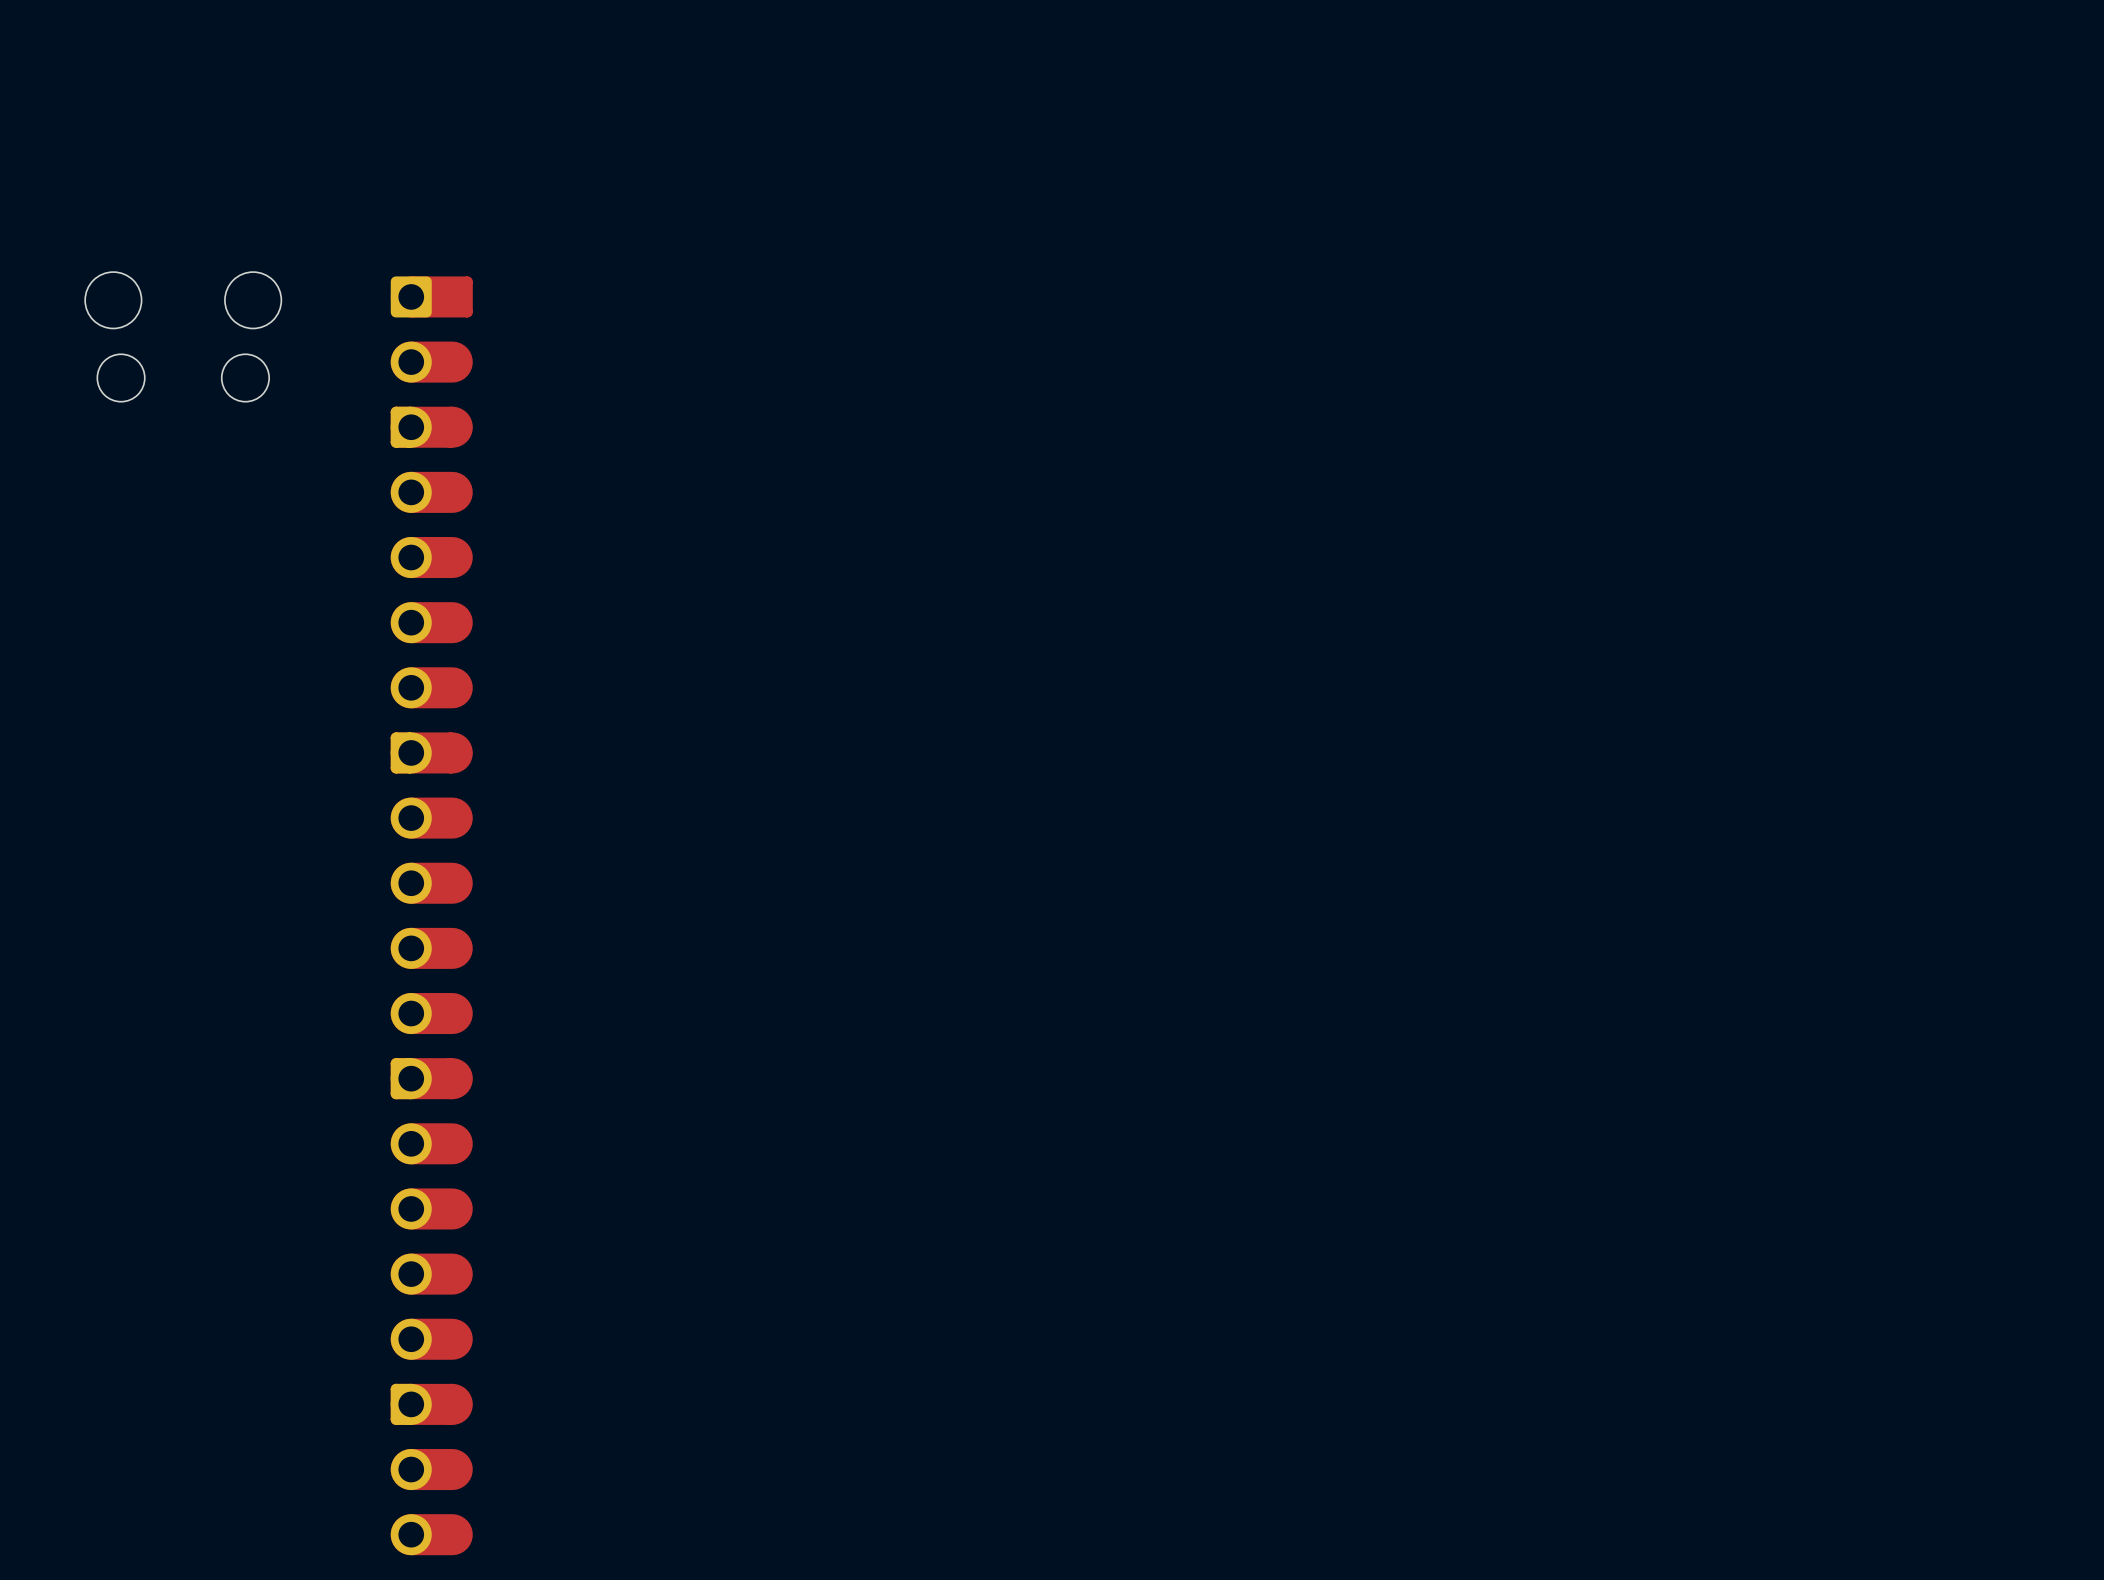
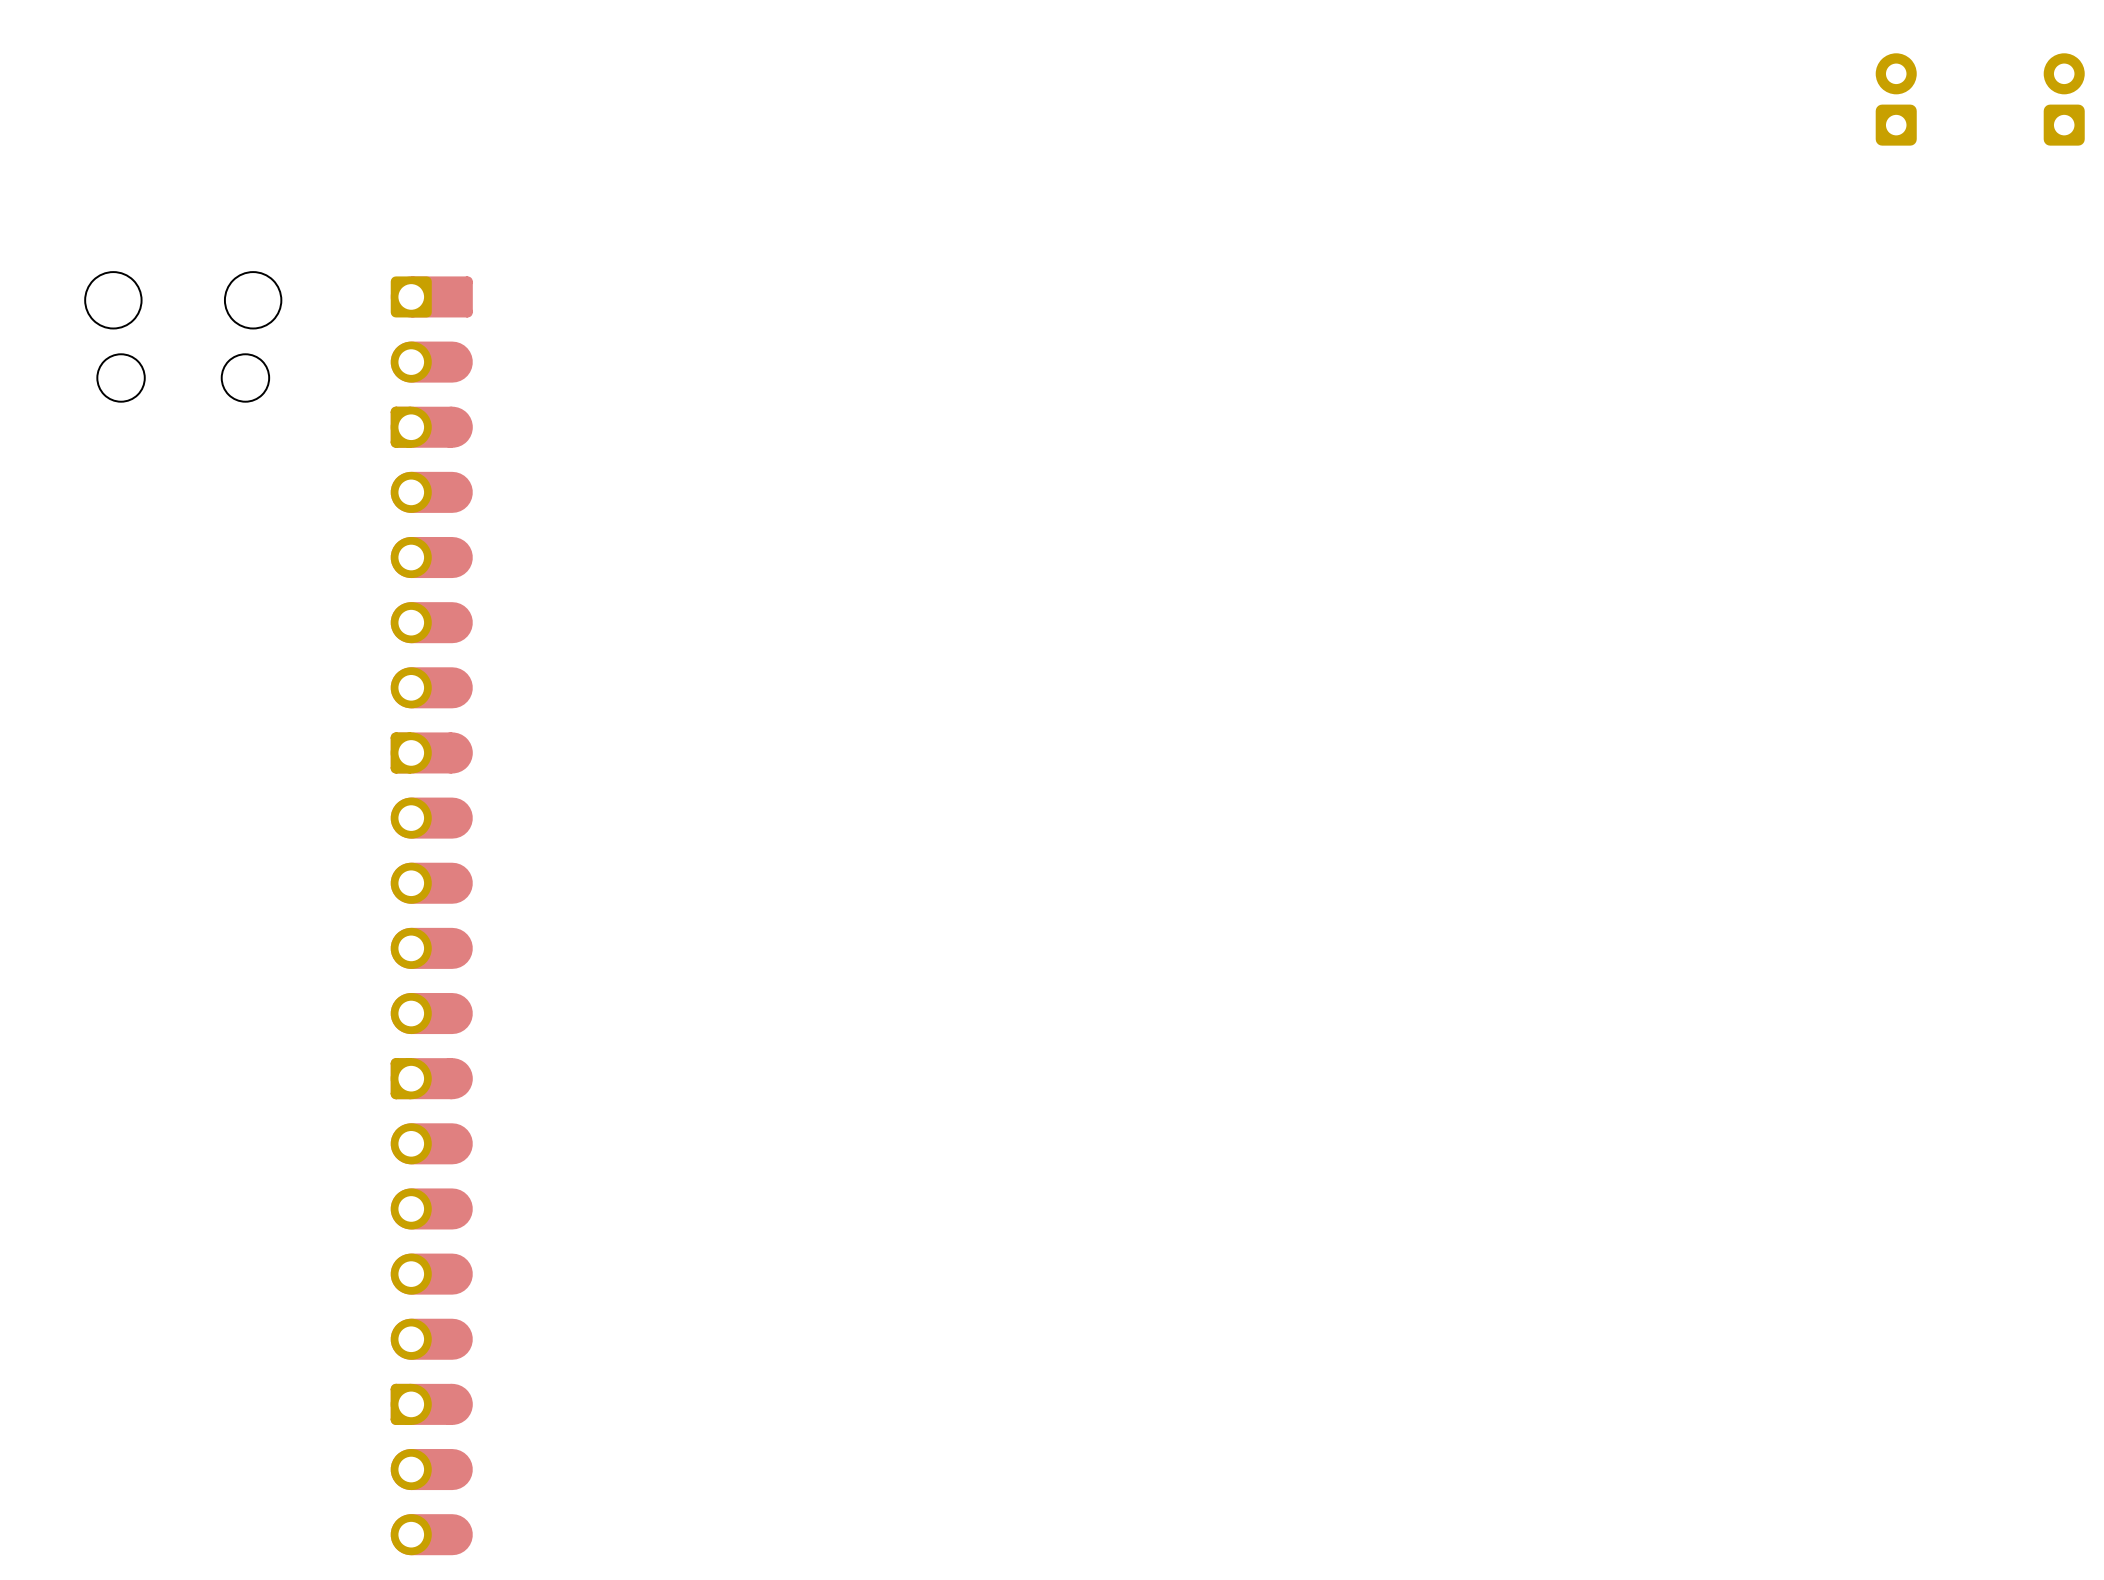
part: none -> (1896, 99)
part: none -> (2064, 99)

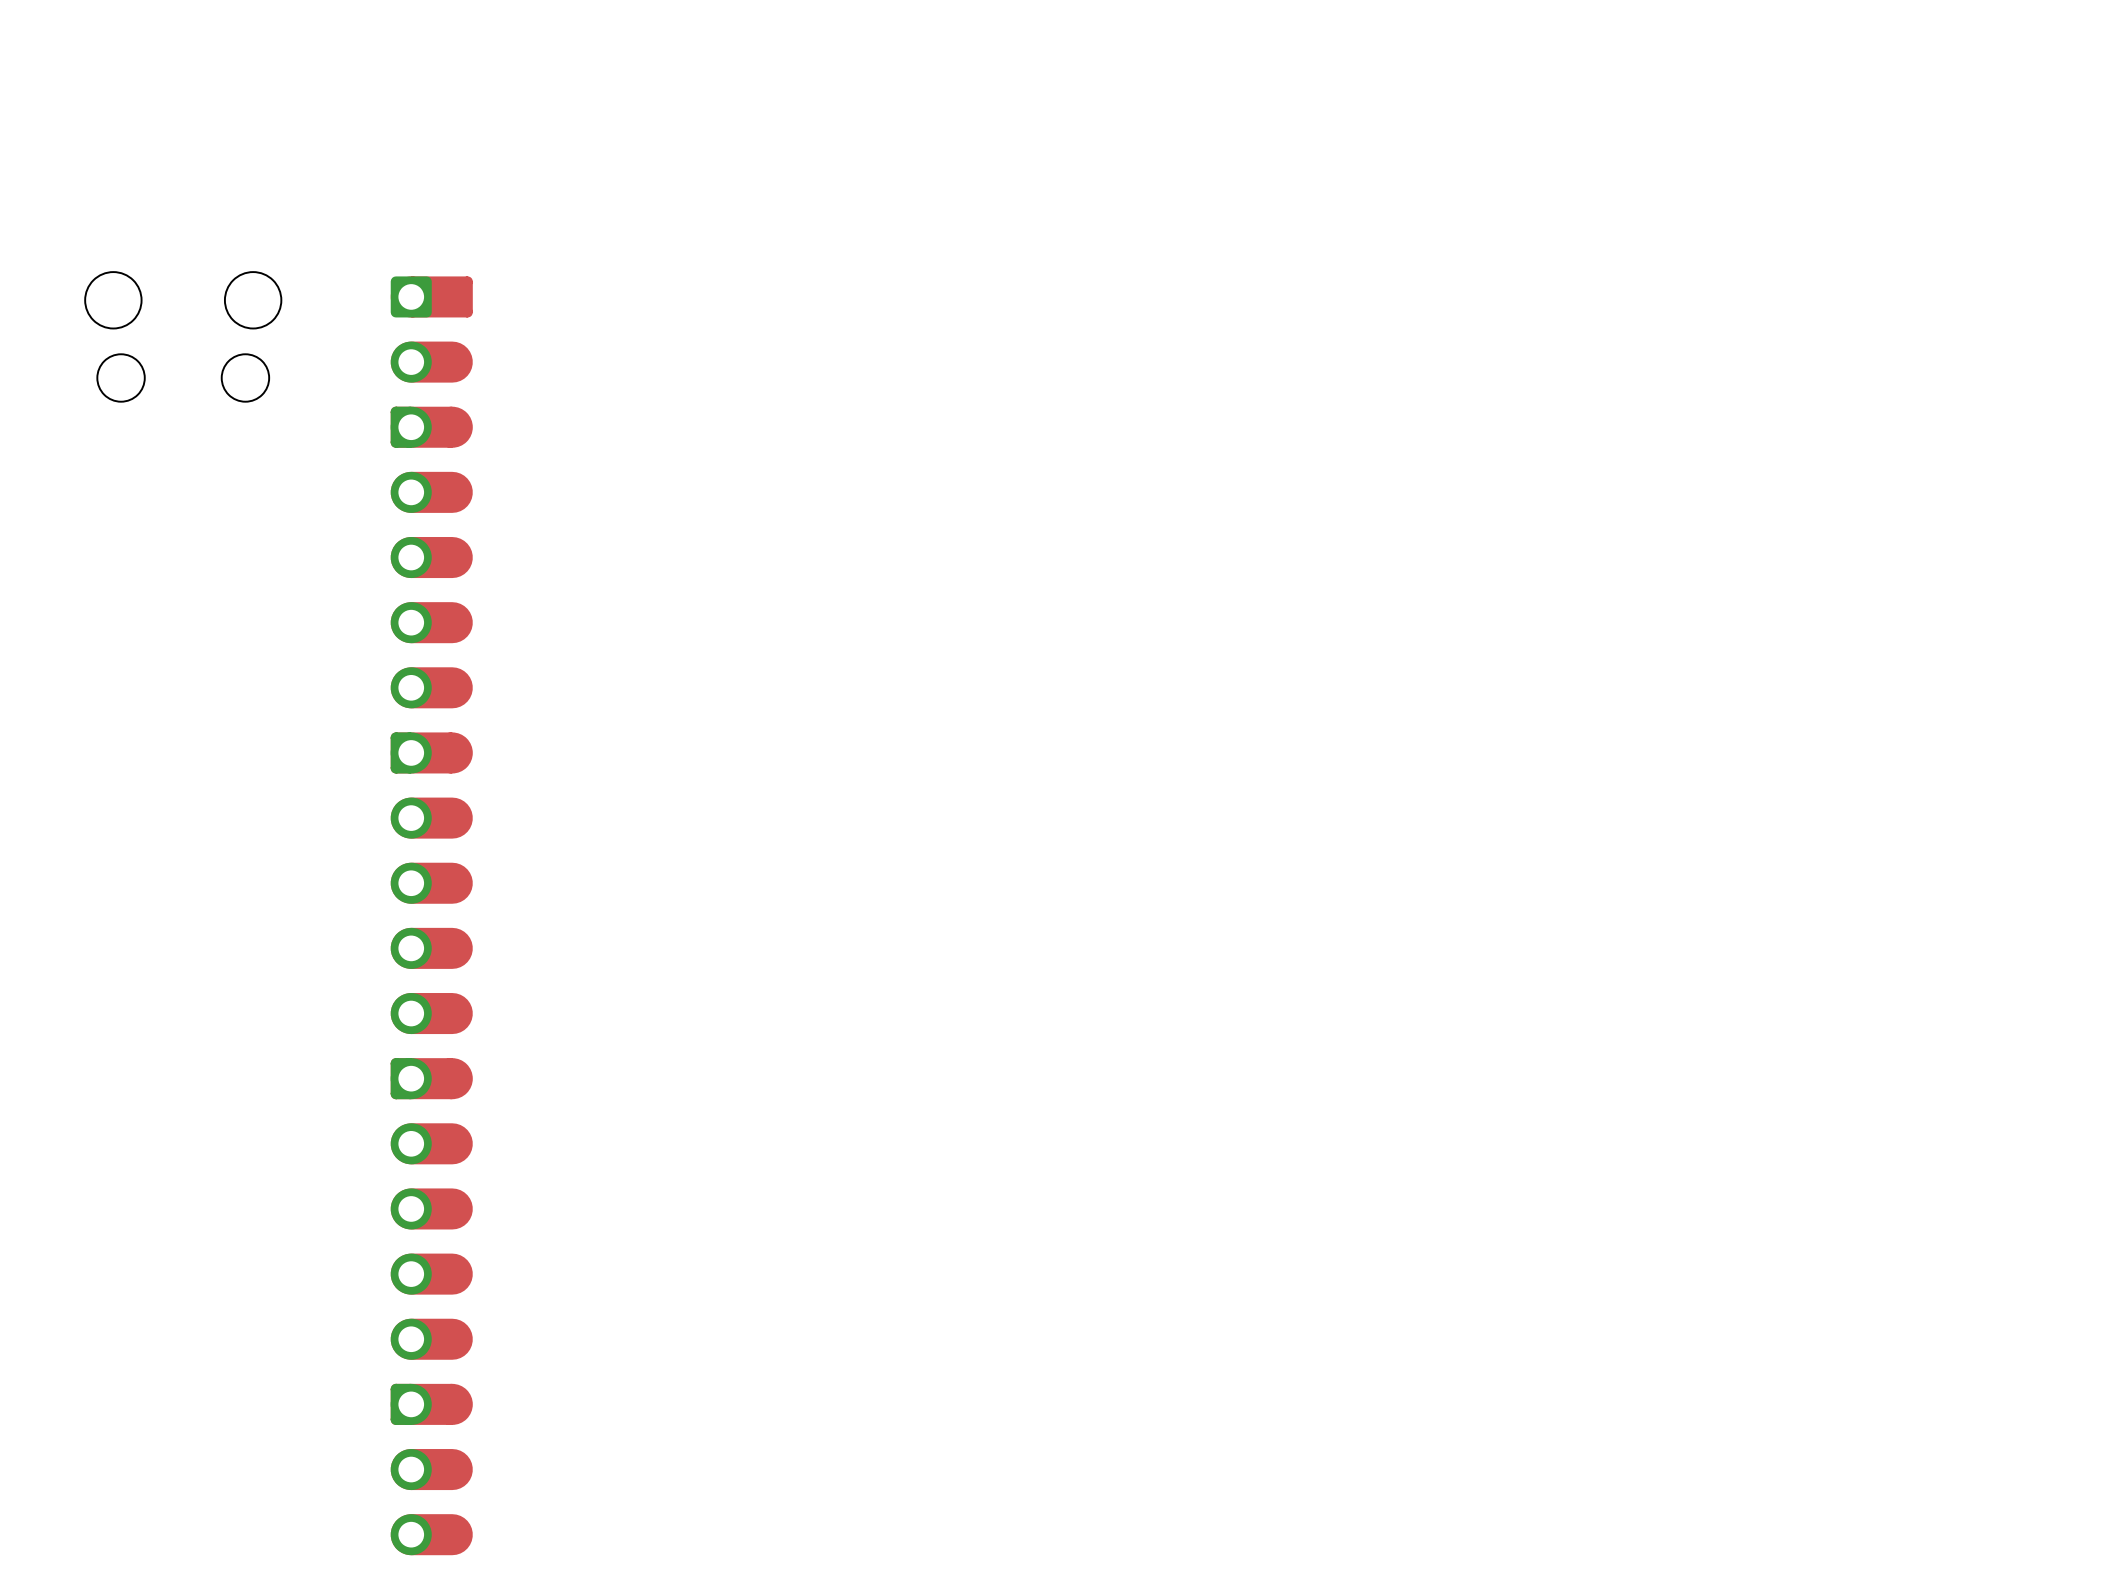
part: (1896, 99) -> none
part: (2064, 99) -> none

